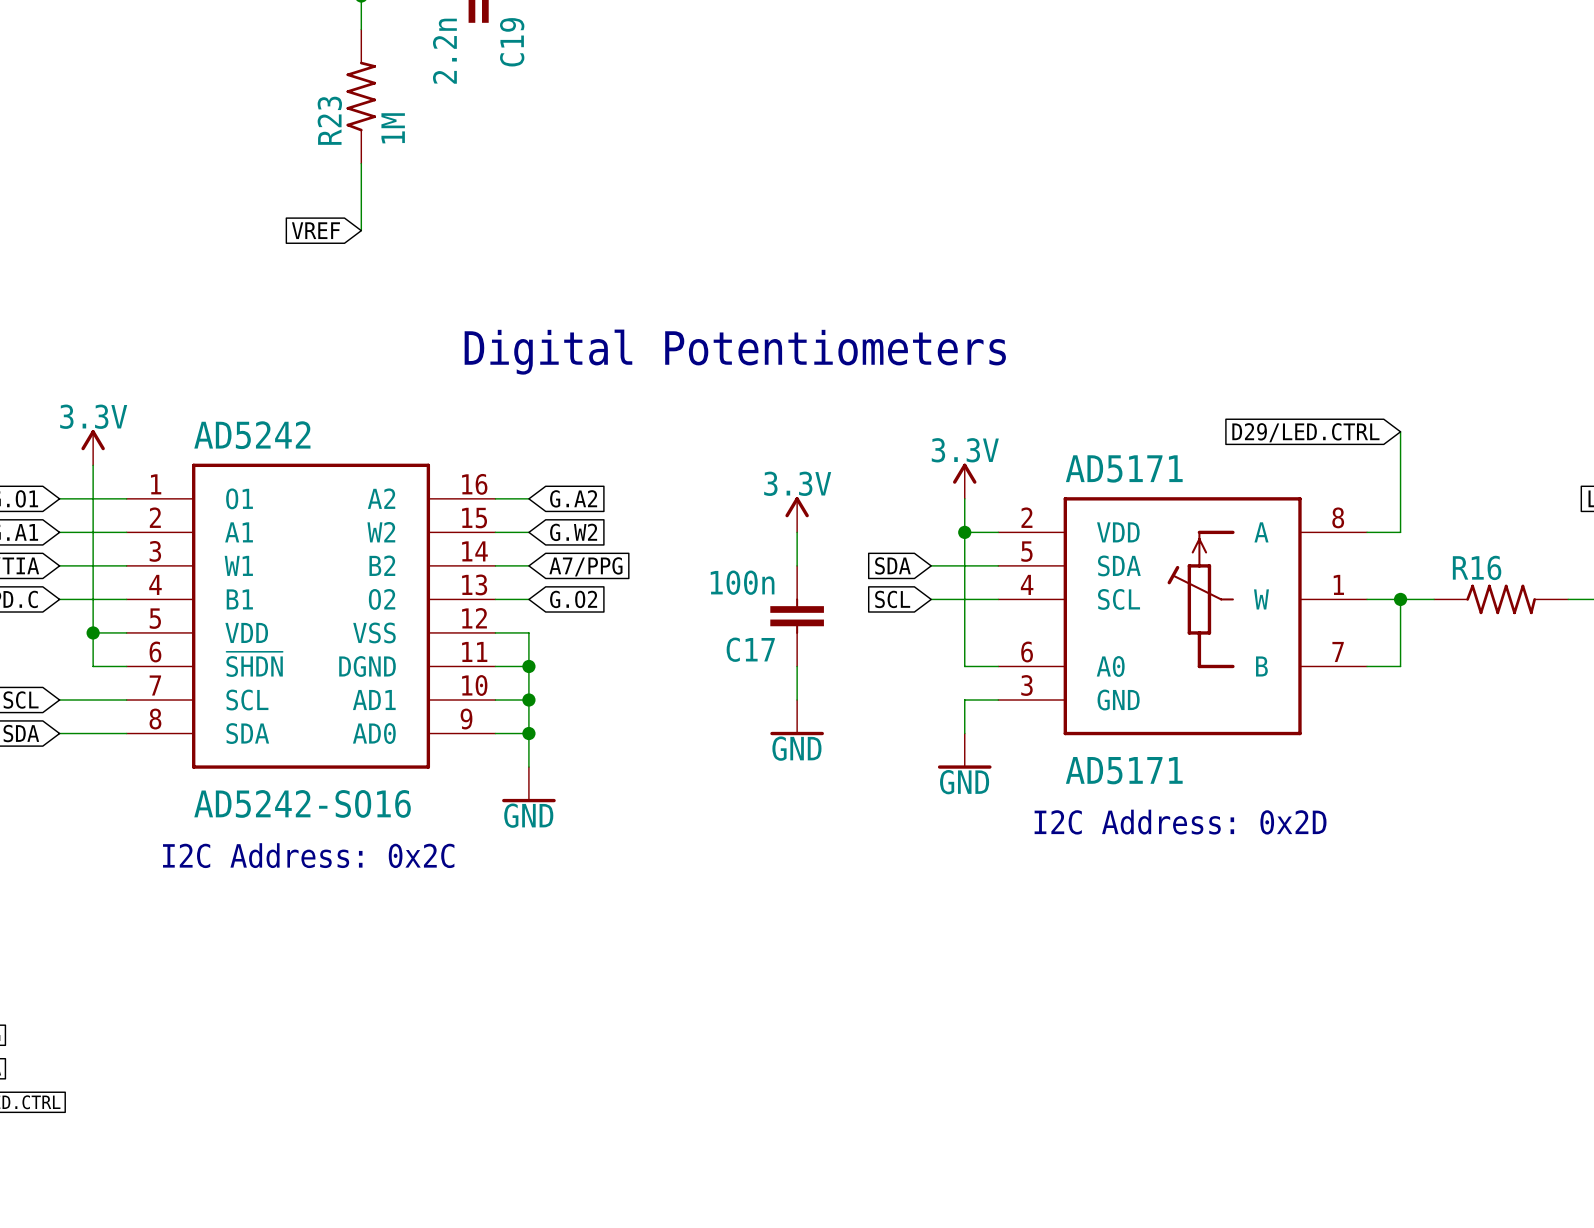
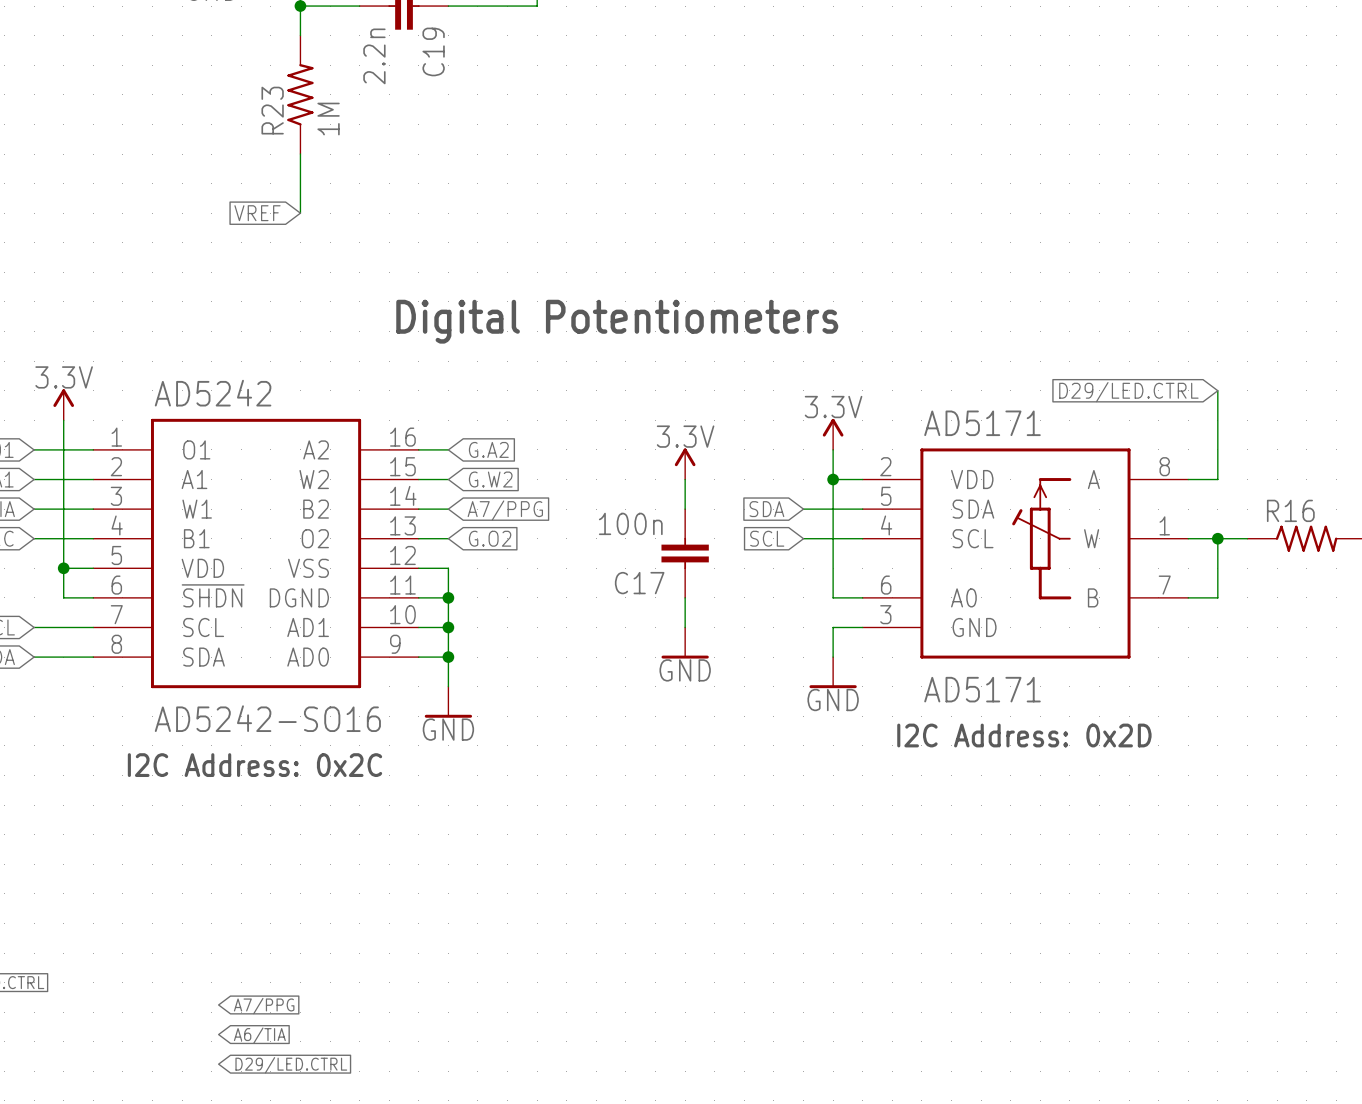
global label: none -> A7/PPG (264, 1006)
global label: none -> A6/TIA (259, 1035)
global label: none -> D29/LED.CTRL (291, 1065)

